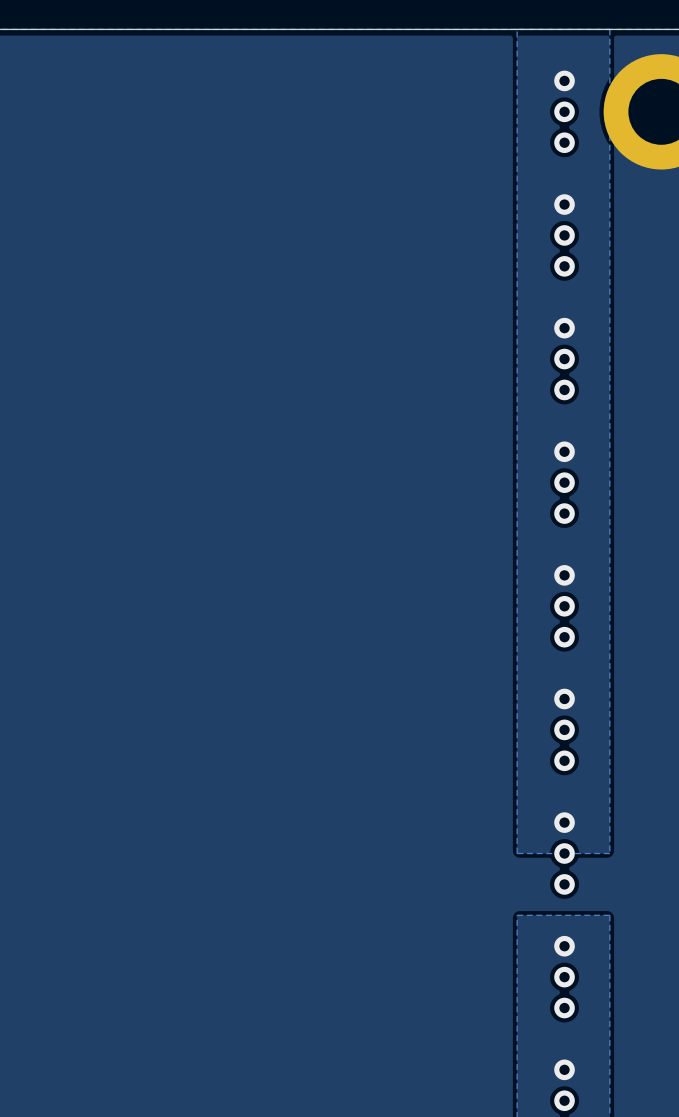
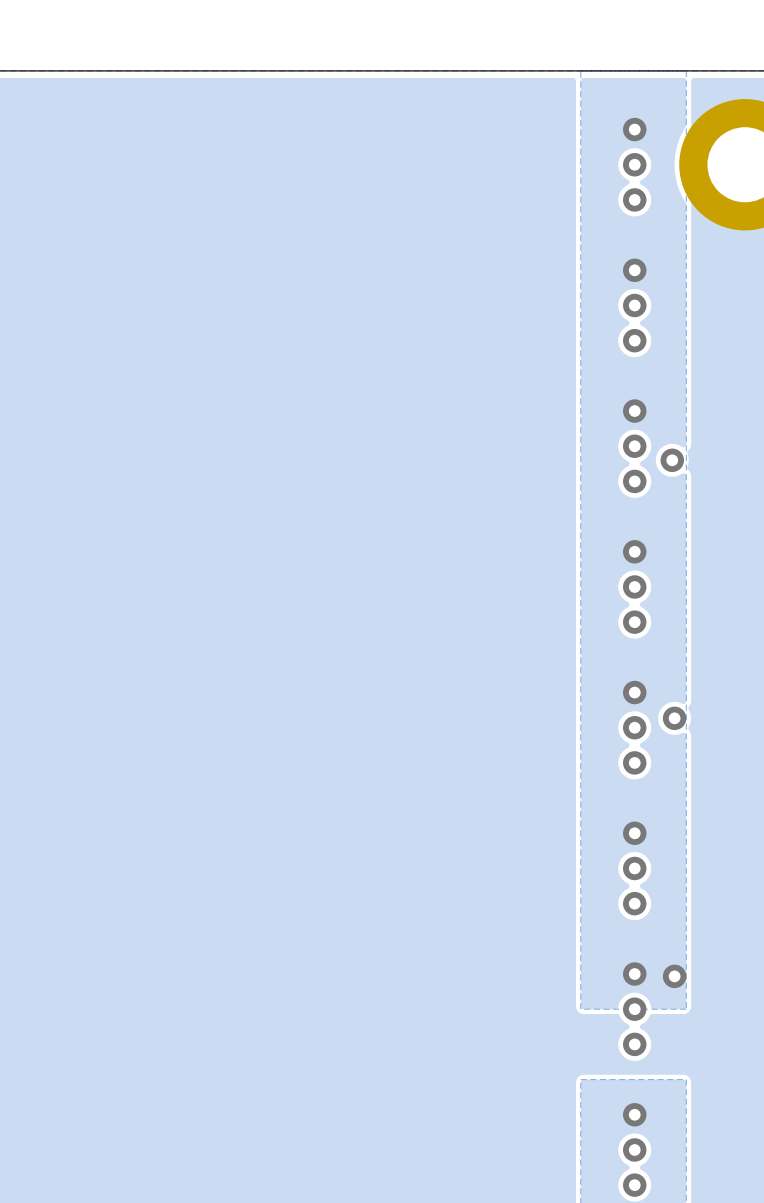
via: none -> (672, 460)
via: none -> (674, 718)
via: none -> (674, 976)

